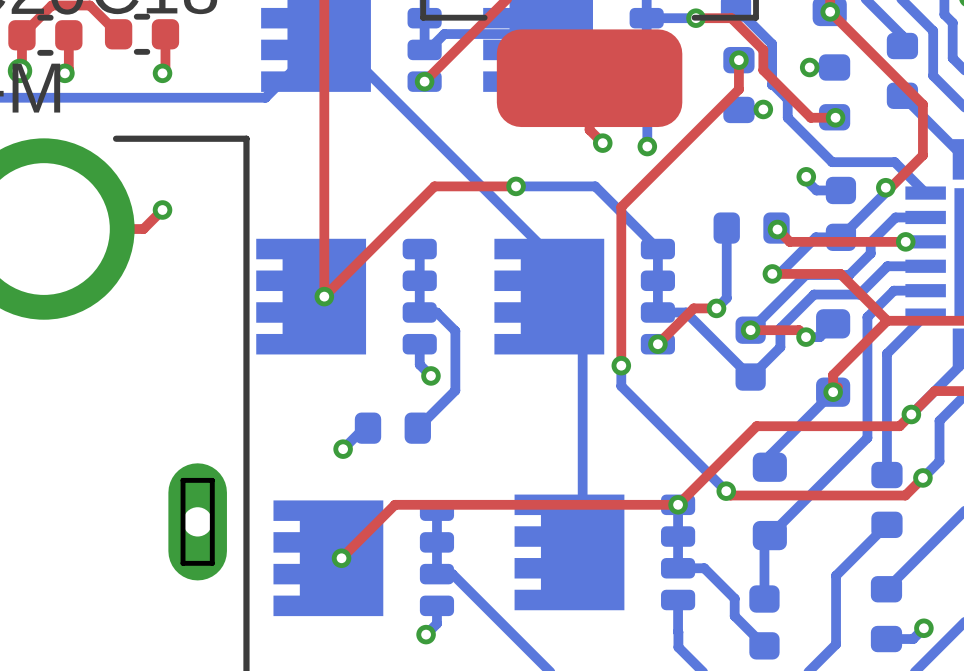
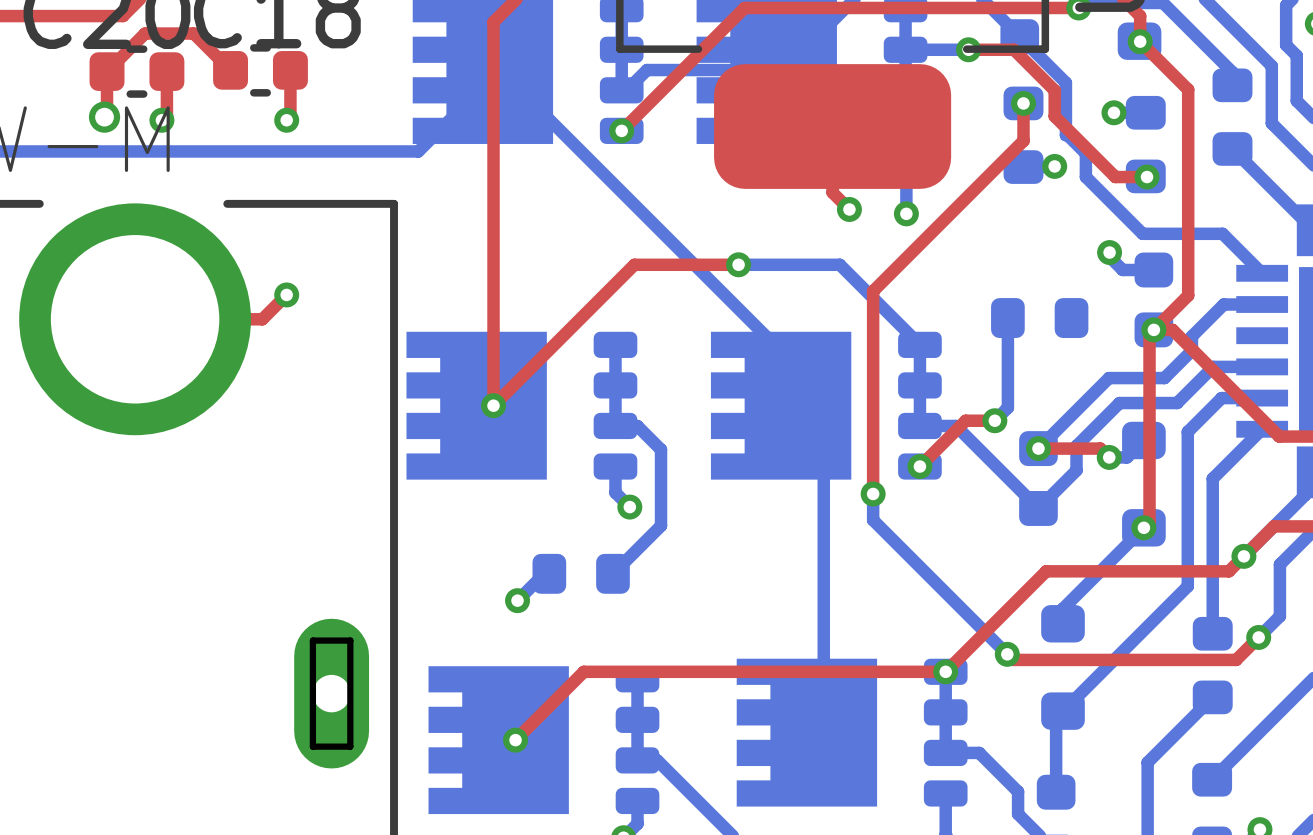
top track: (867, 49) (922, 104) (922, 155) (890, 187) (885, 187) -> (1188, 89) (1188, 295) (1149, 334) (1149, 522)
bottom track: (885, 187) (885, 192) (840, 237) (815, 237) (779, 273) (772, 273) -> none
via: (885, 187) -> none
top track: (777, 229) (789, 241) (905, 241) -> none
via: (777, 229) -> none
via: none -> (1153, 329)
via: (905, 241) -> none
top track: (772, 273) (840, 273) (887, 320) -> none
via: (772, 273) -> none
top track: (887, 320) (939, 320) -> (1153, 329) (1172, 329) (1279, 436)
top track: (887, 320) (833, 374) (833, 392) -> none

